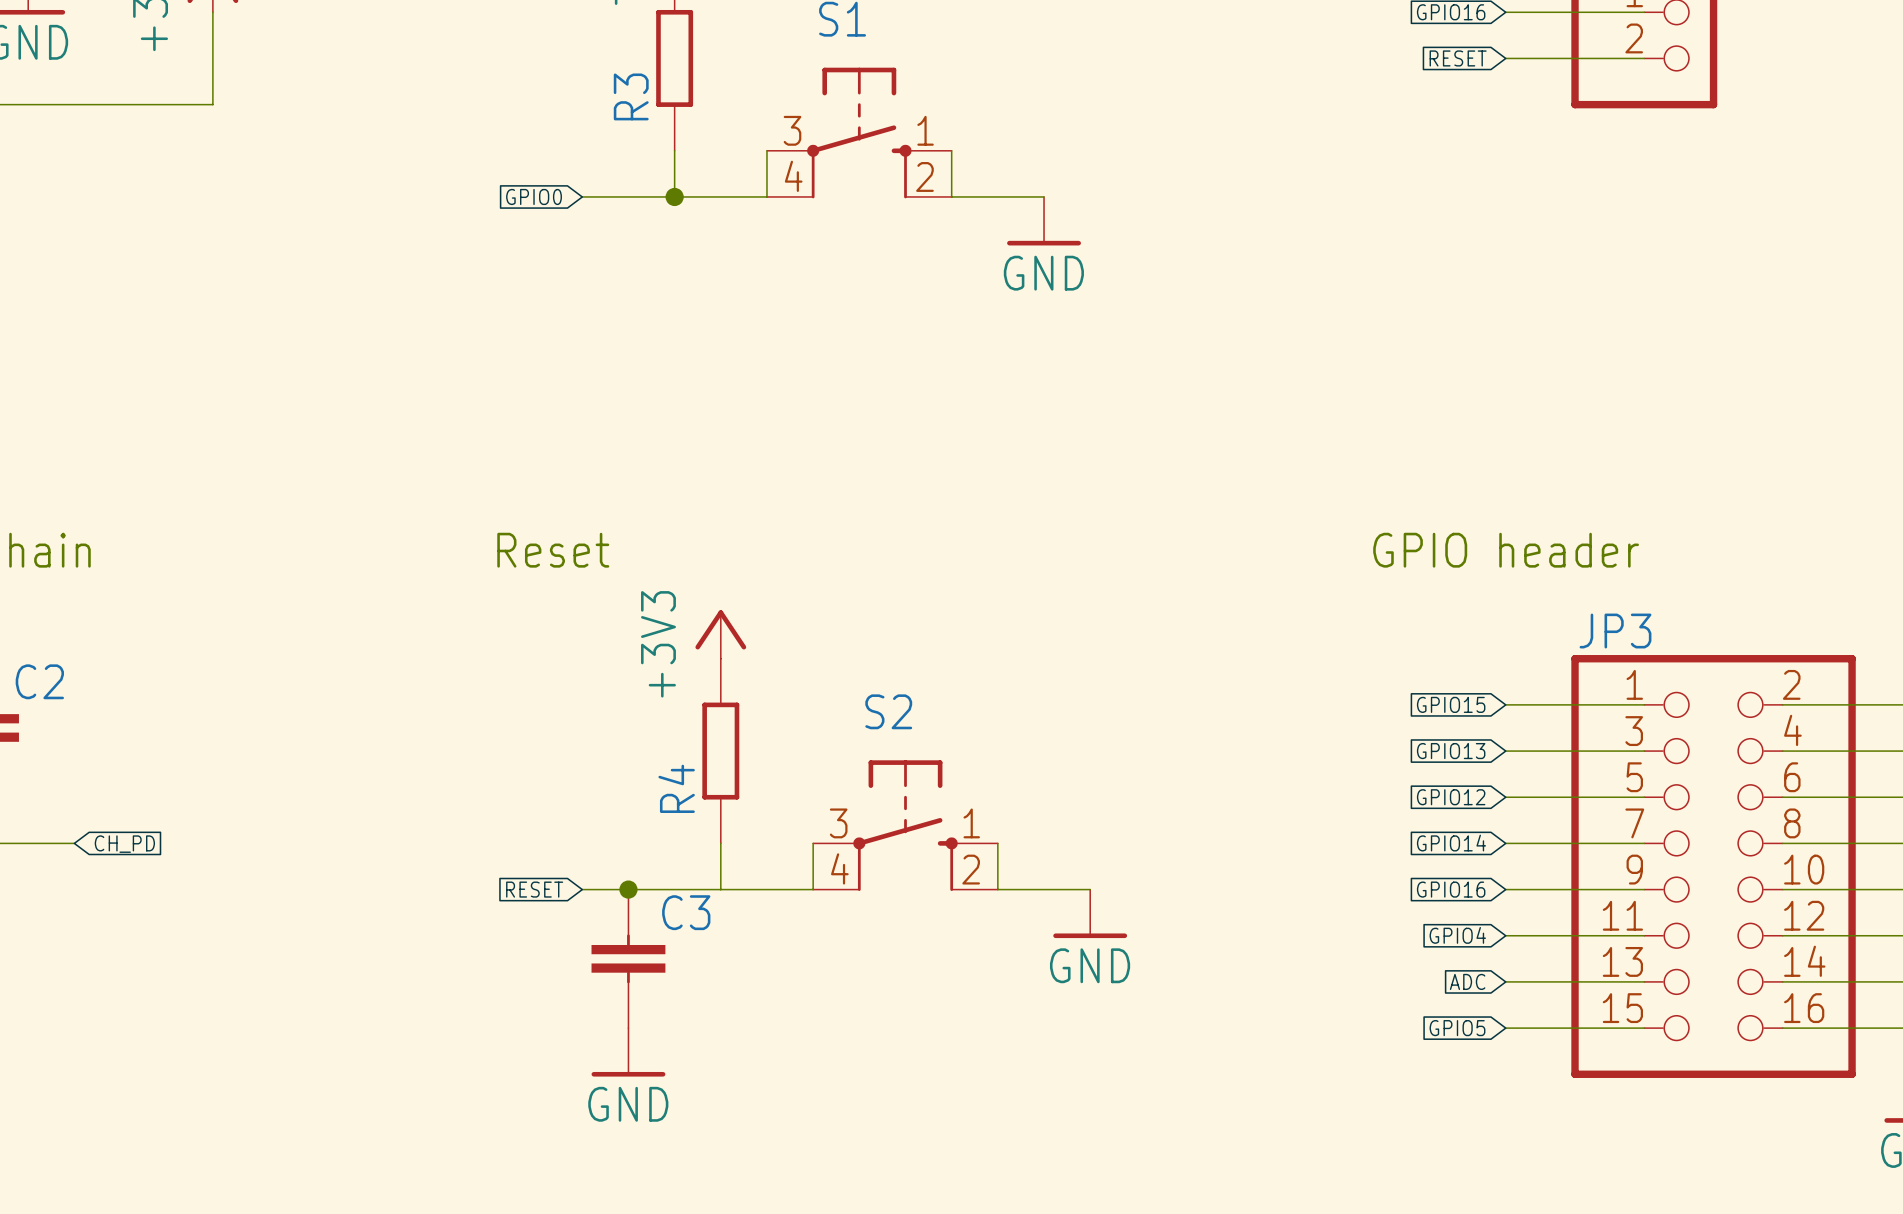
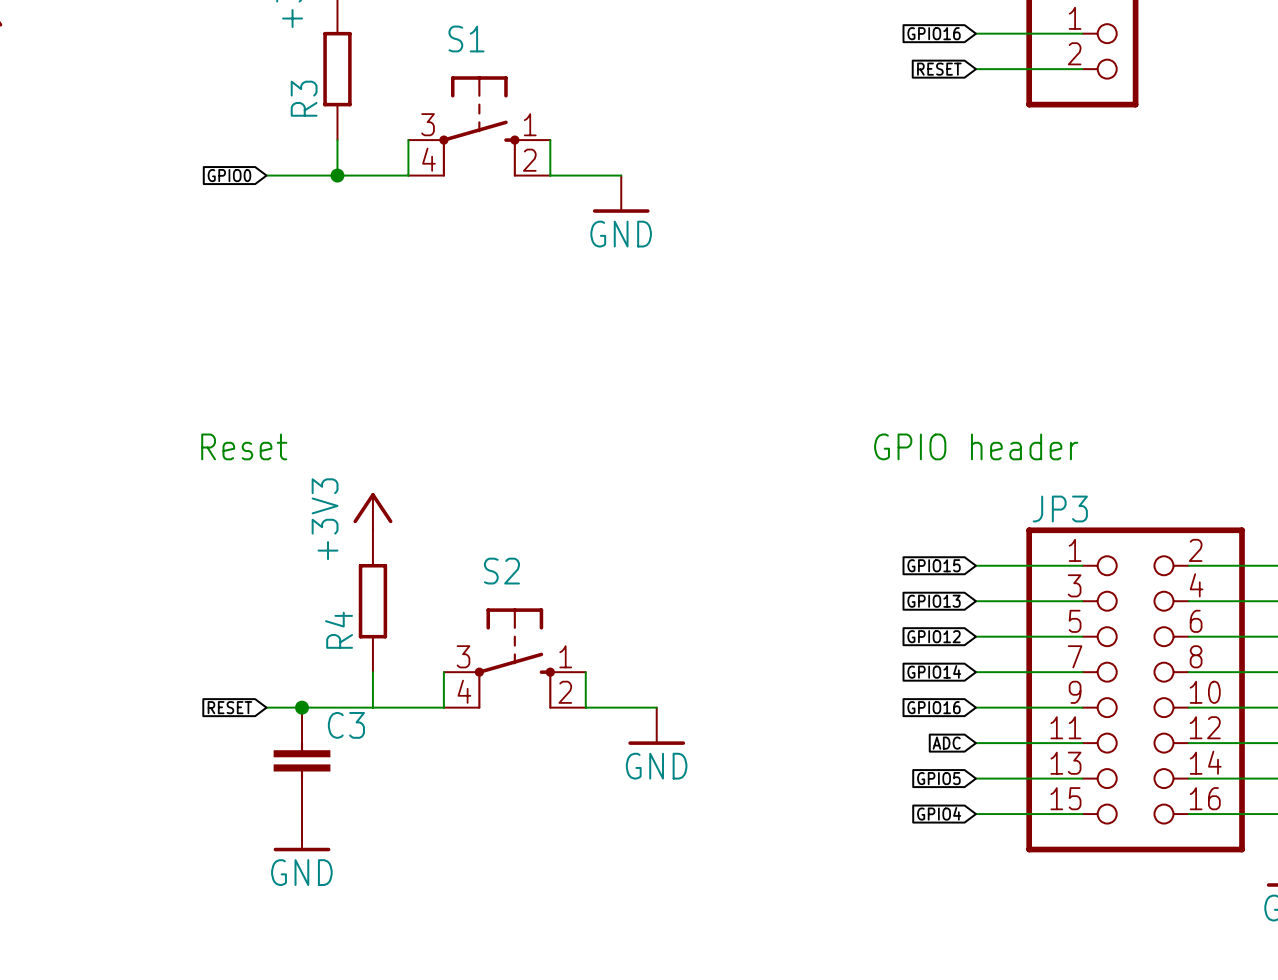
global label: GPIO4 (1457, 935) -> ADC (946, 743)
global label: ADC (1467, 981) -> GPIO5 (938, 778)
global label: GPIO5 (1457, 1028) -> GPIO4 (939, 813)

